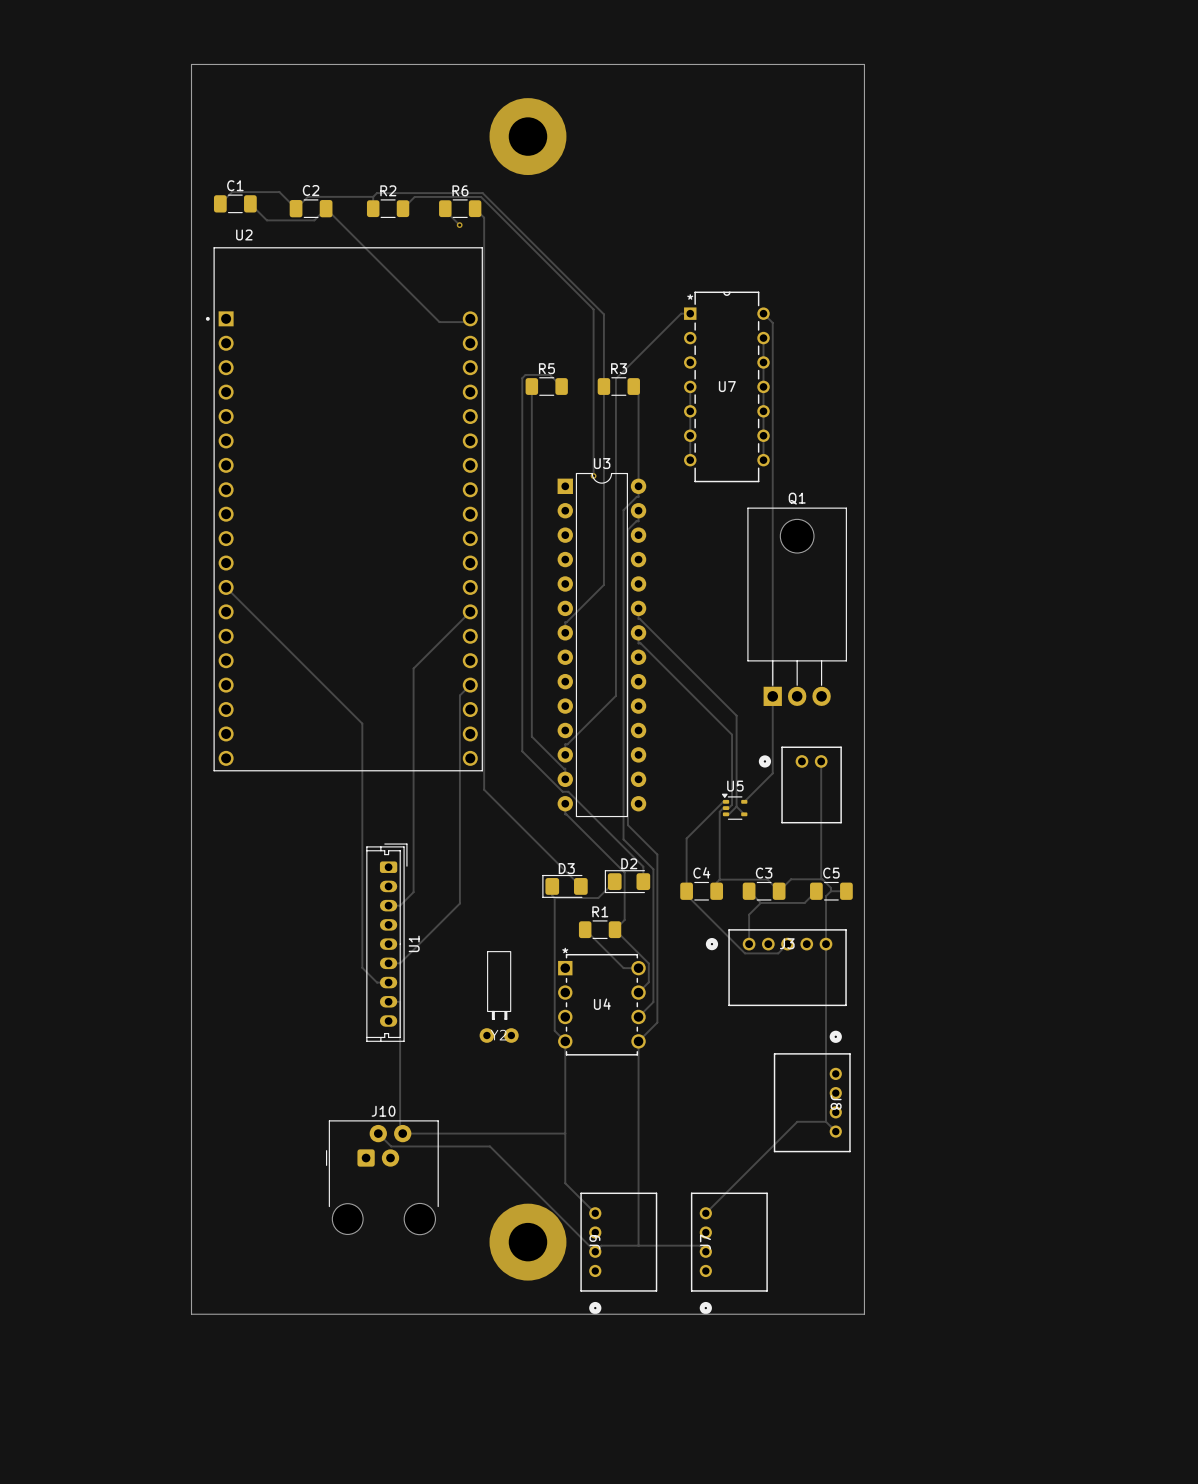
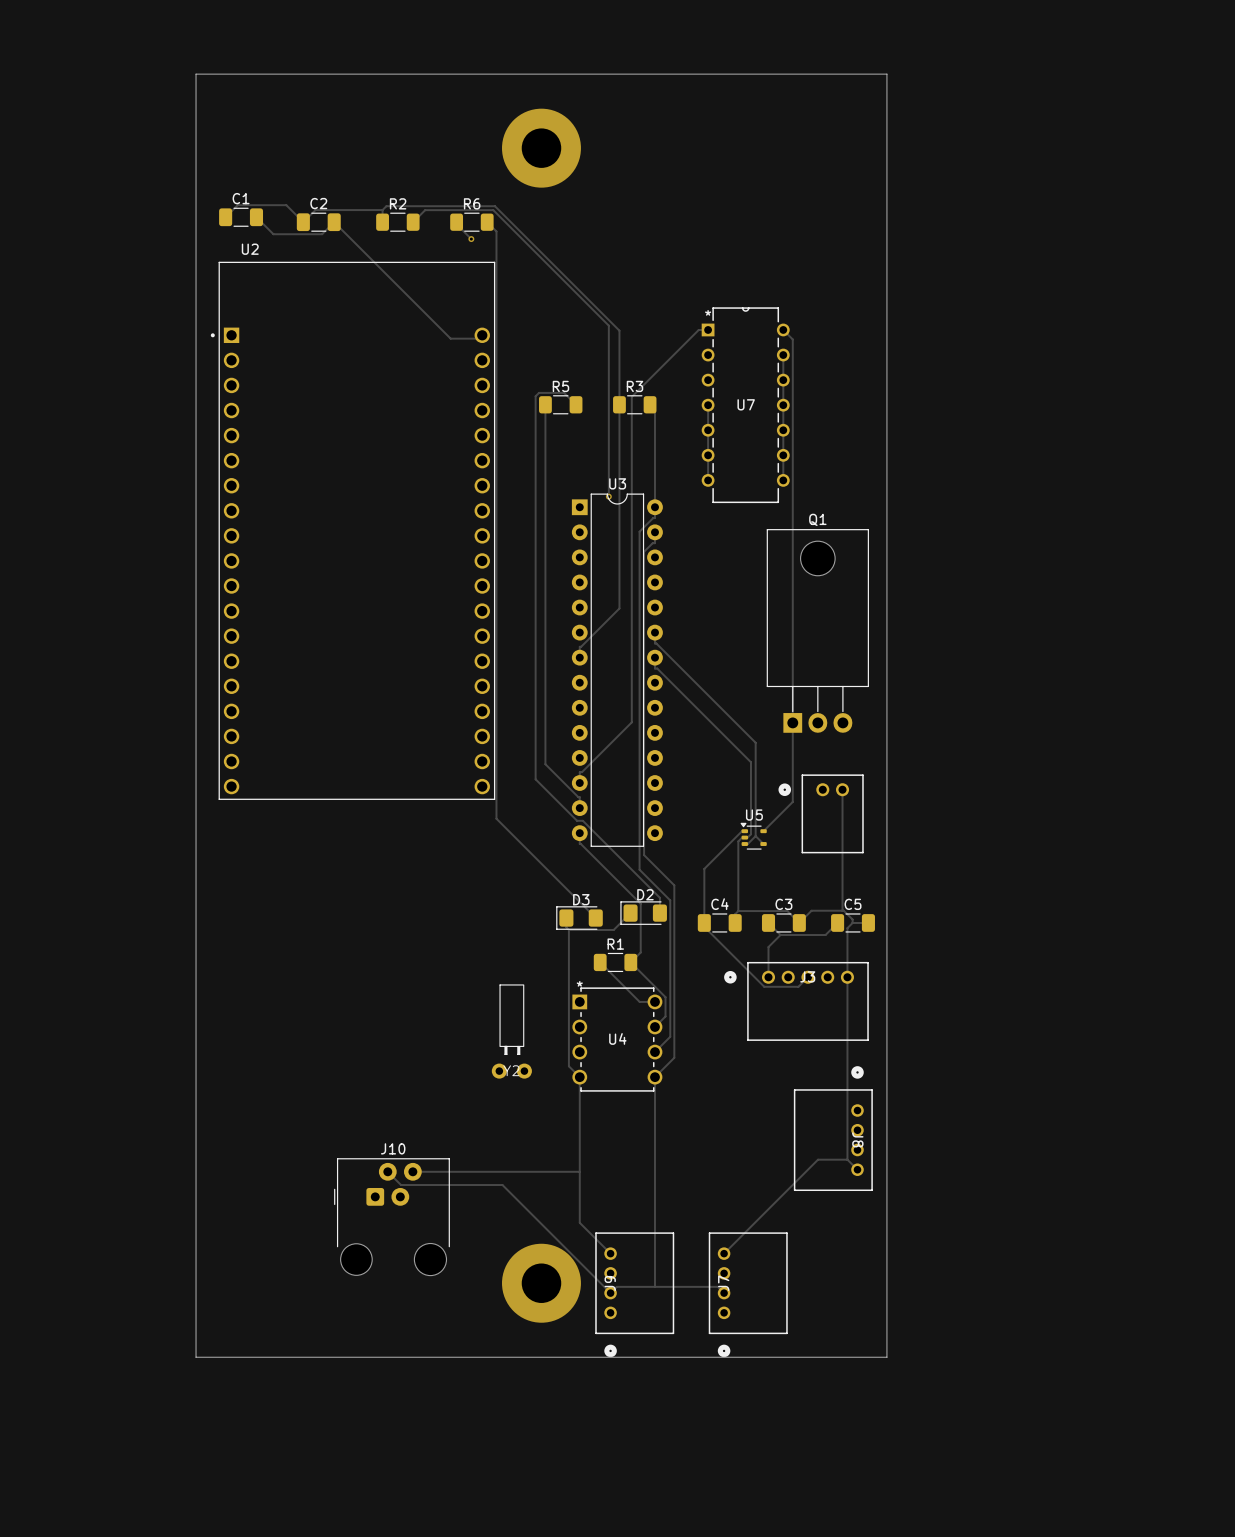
track: (226, 587) (362, 723) (362, 967) (377, 982) (388, 982) -> none
track: (470, 611) (413, 668) (413, 892) (400, 905) (388, 905) -> none
track: (470, 685) (459, 695) (459, 903) (400, 963) (388, 963) -> none
U1: (386, 942) -> none
track: (388, 1001) (400, 1001) (400, 1130) (402, 1133) -> none

